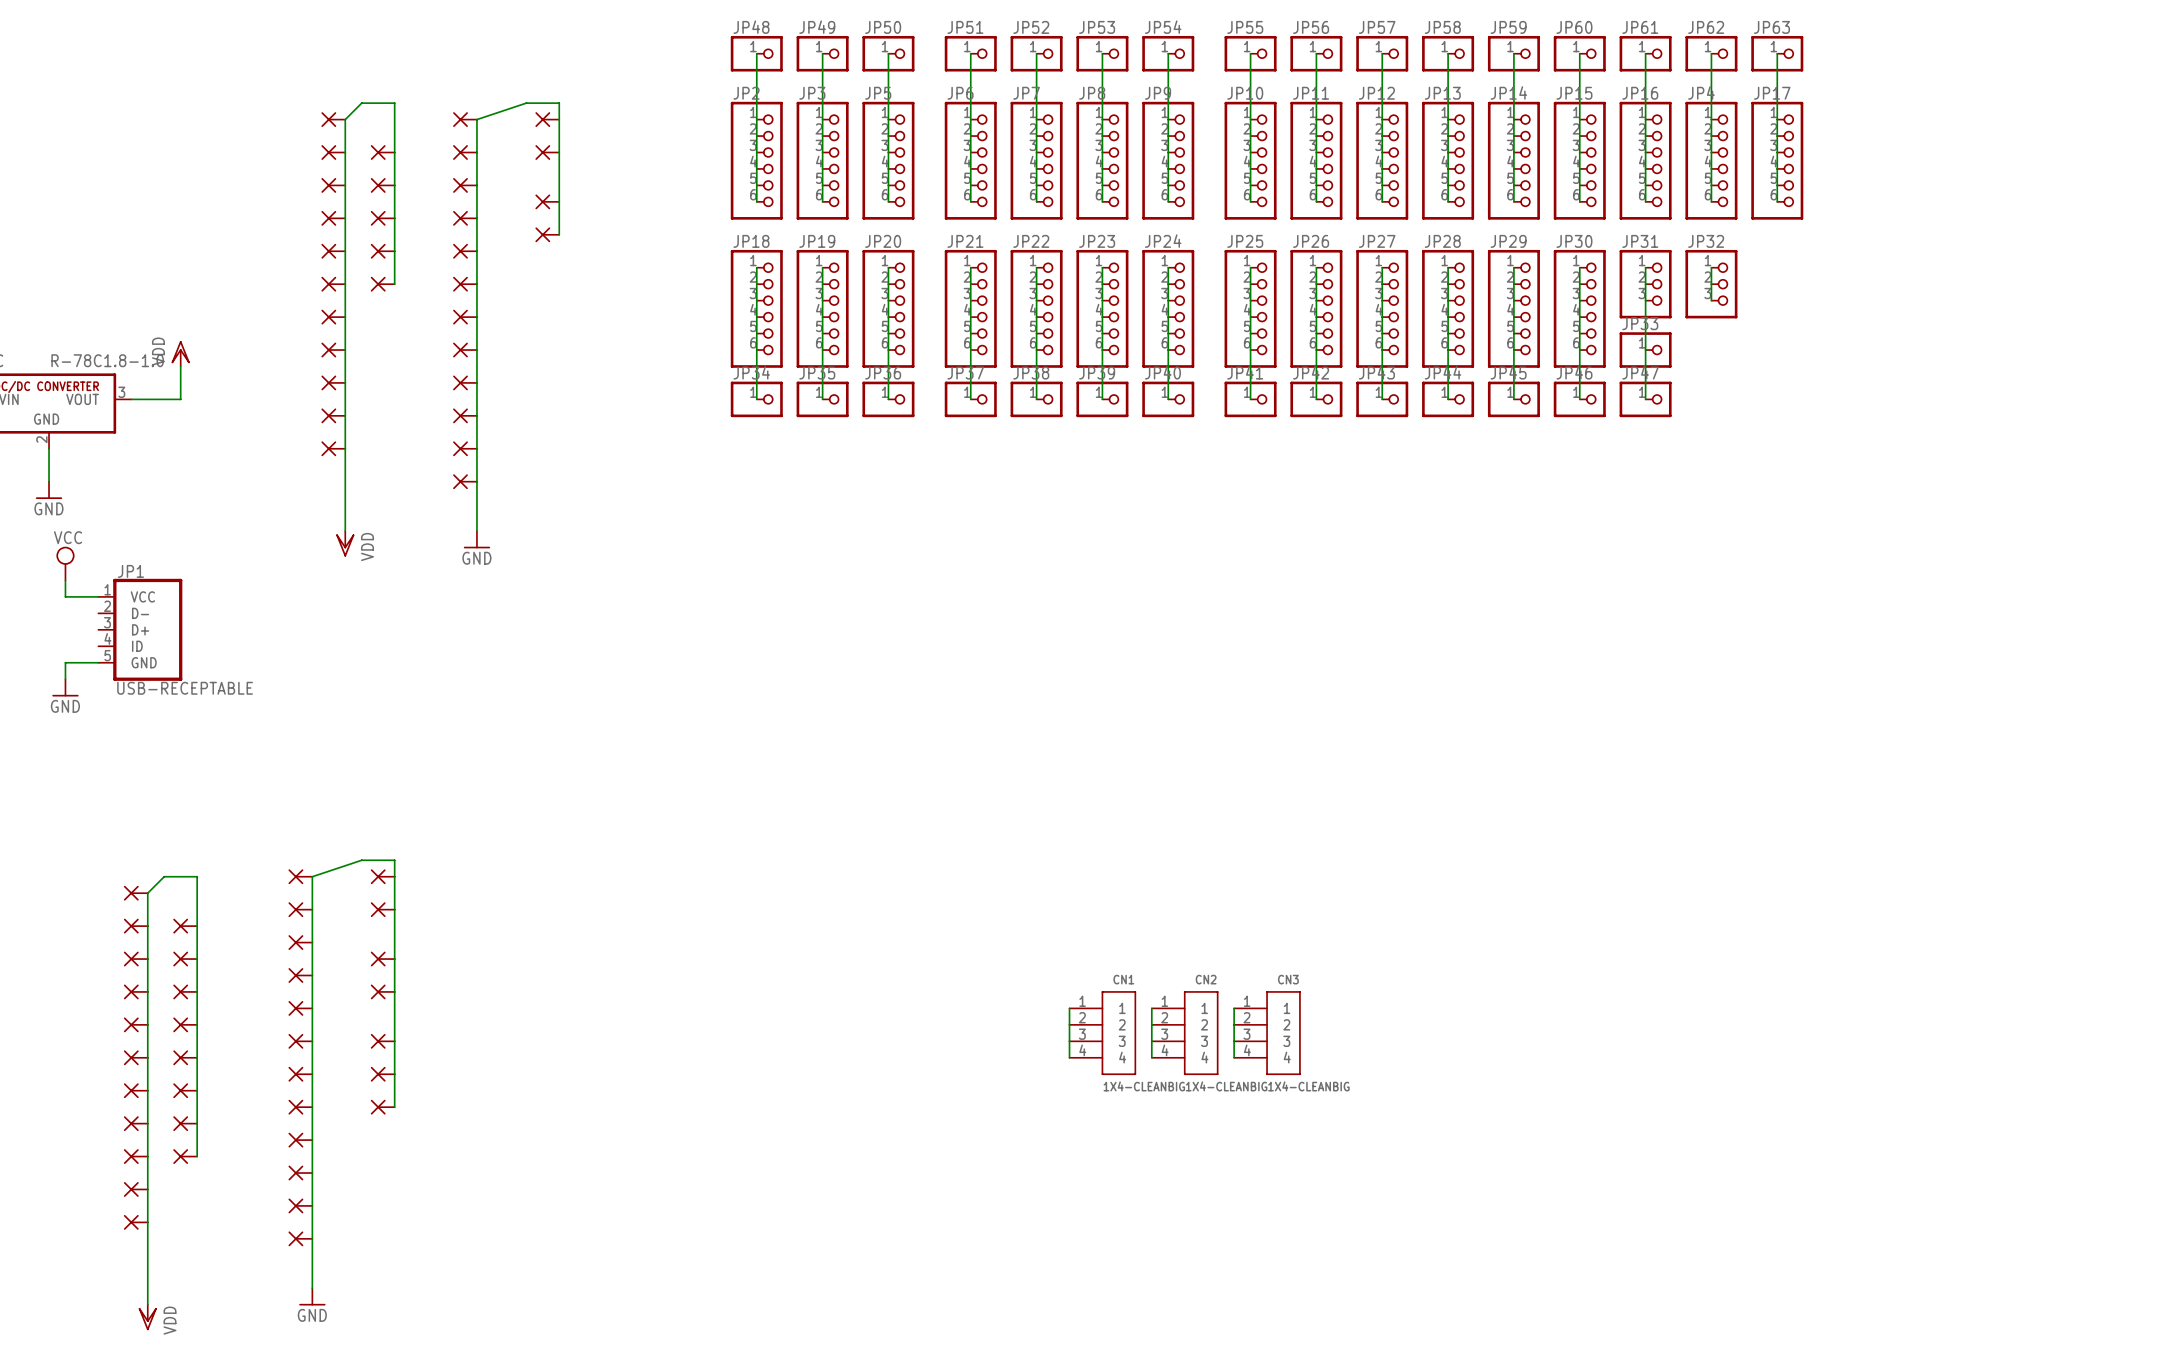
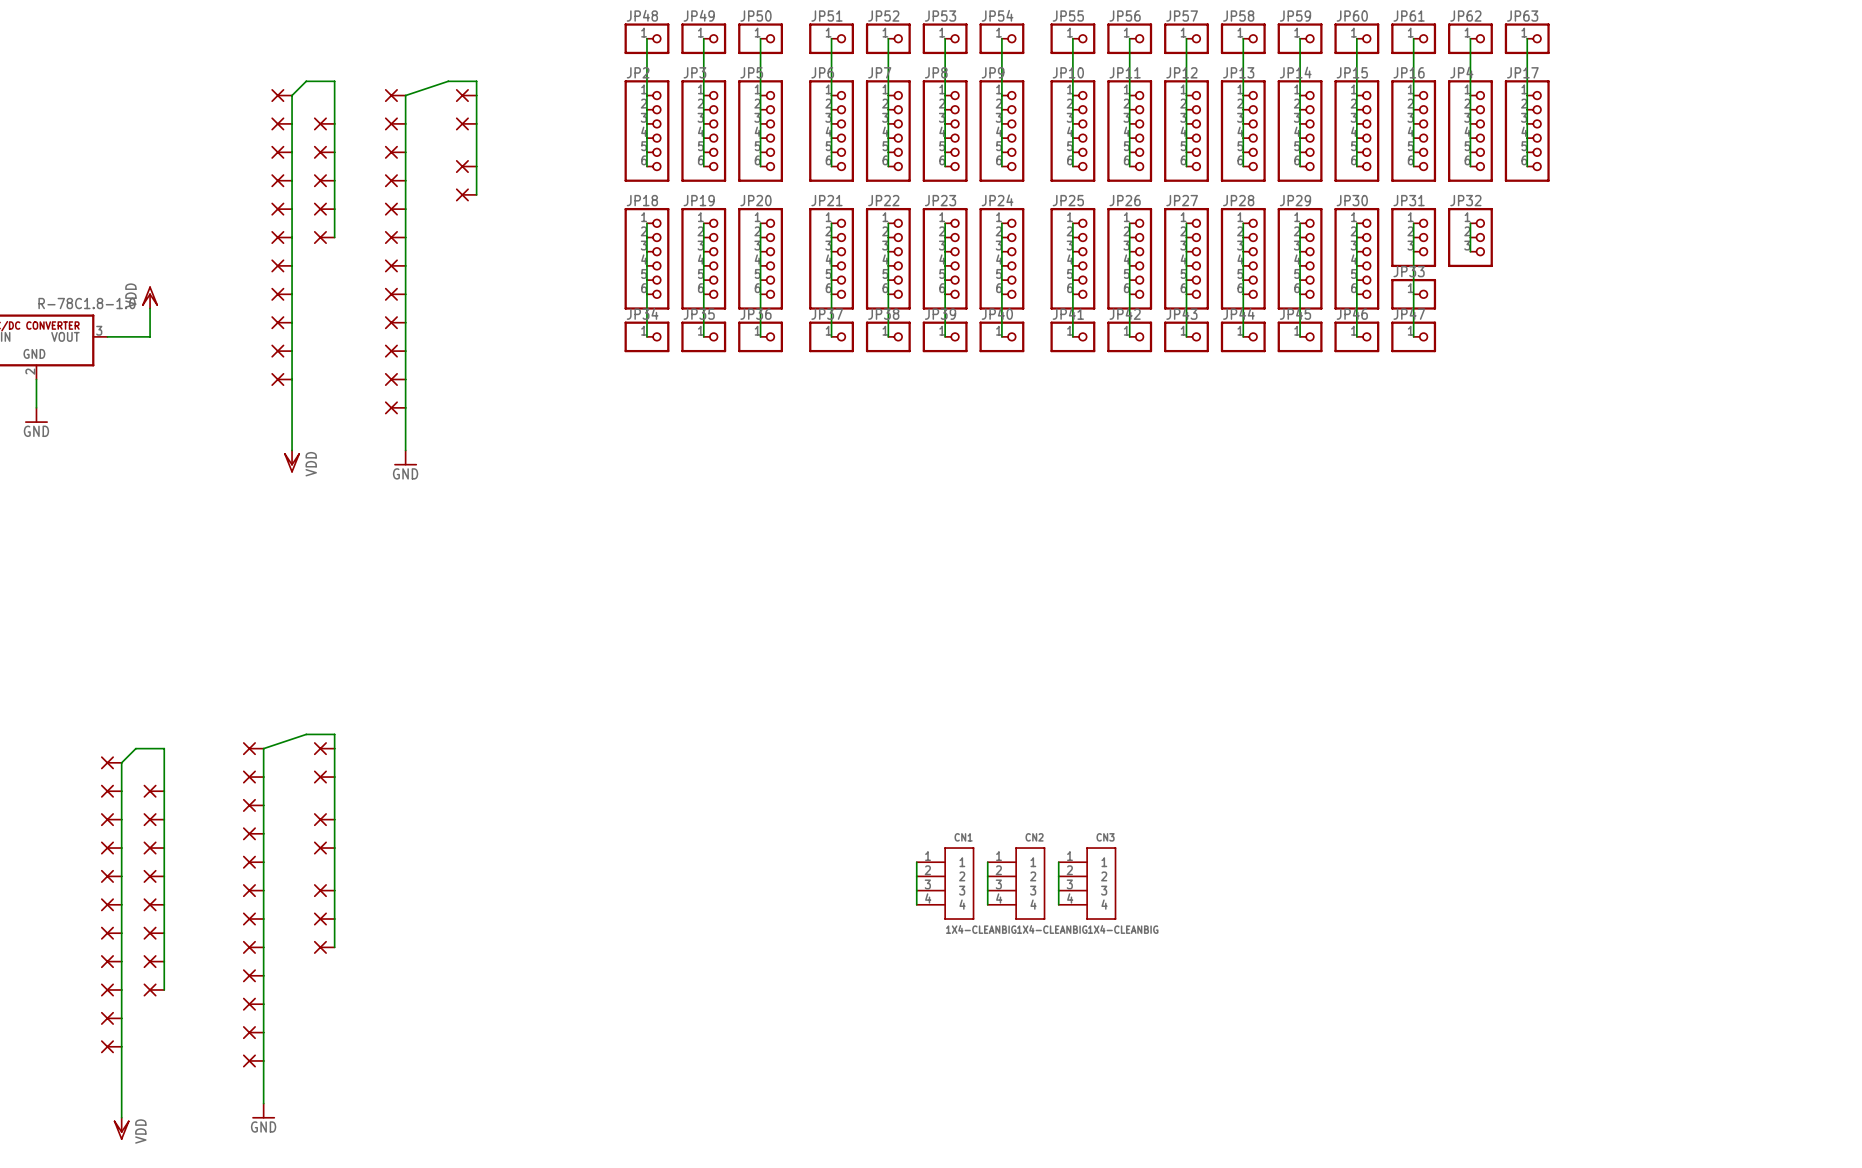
power symbol: VCC (65, 563) -> none
wire: (65, 580) (65, 596) (98, 596) -> none
JP1: USB-RECEPTABLE (140, 629) -> none
wire: (98, 662) (65, 662) (65, 679) -> none
power symbol: GND (65, 687) -> none

